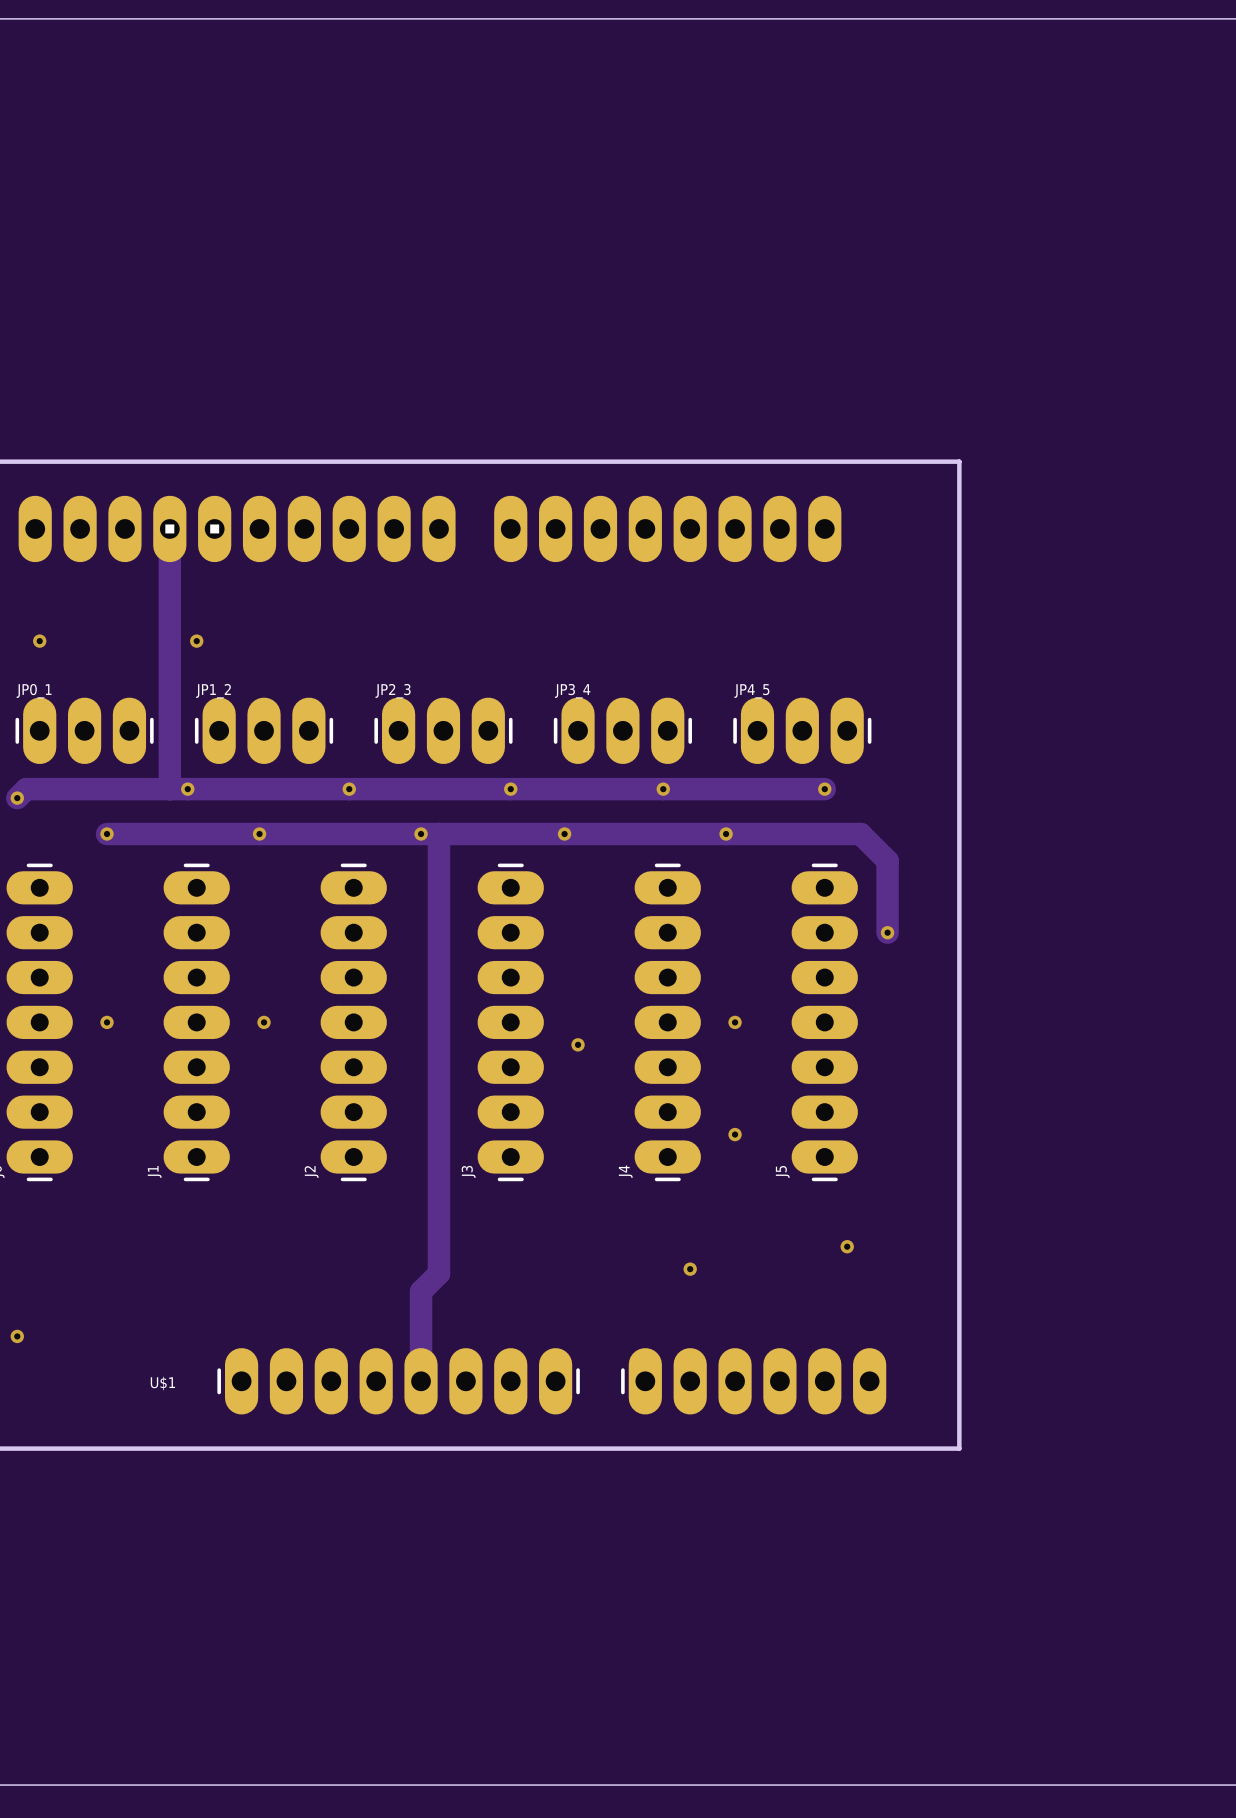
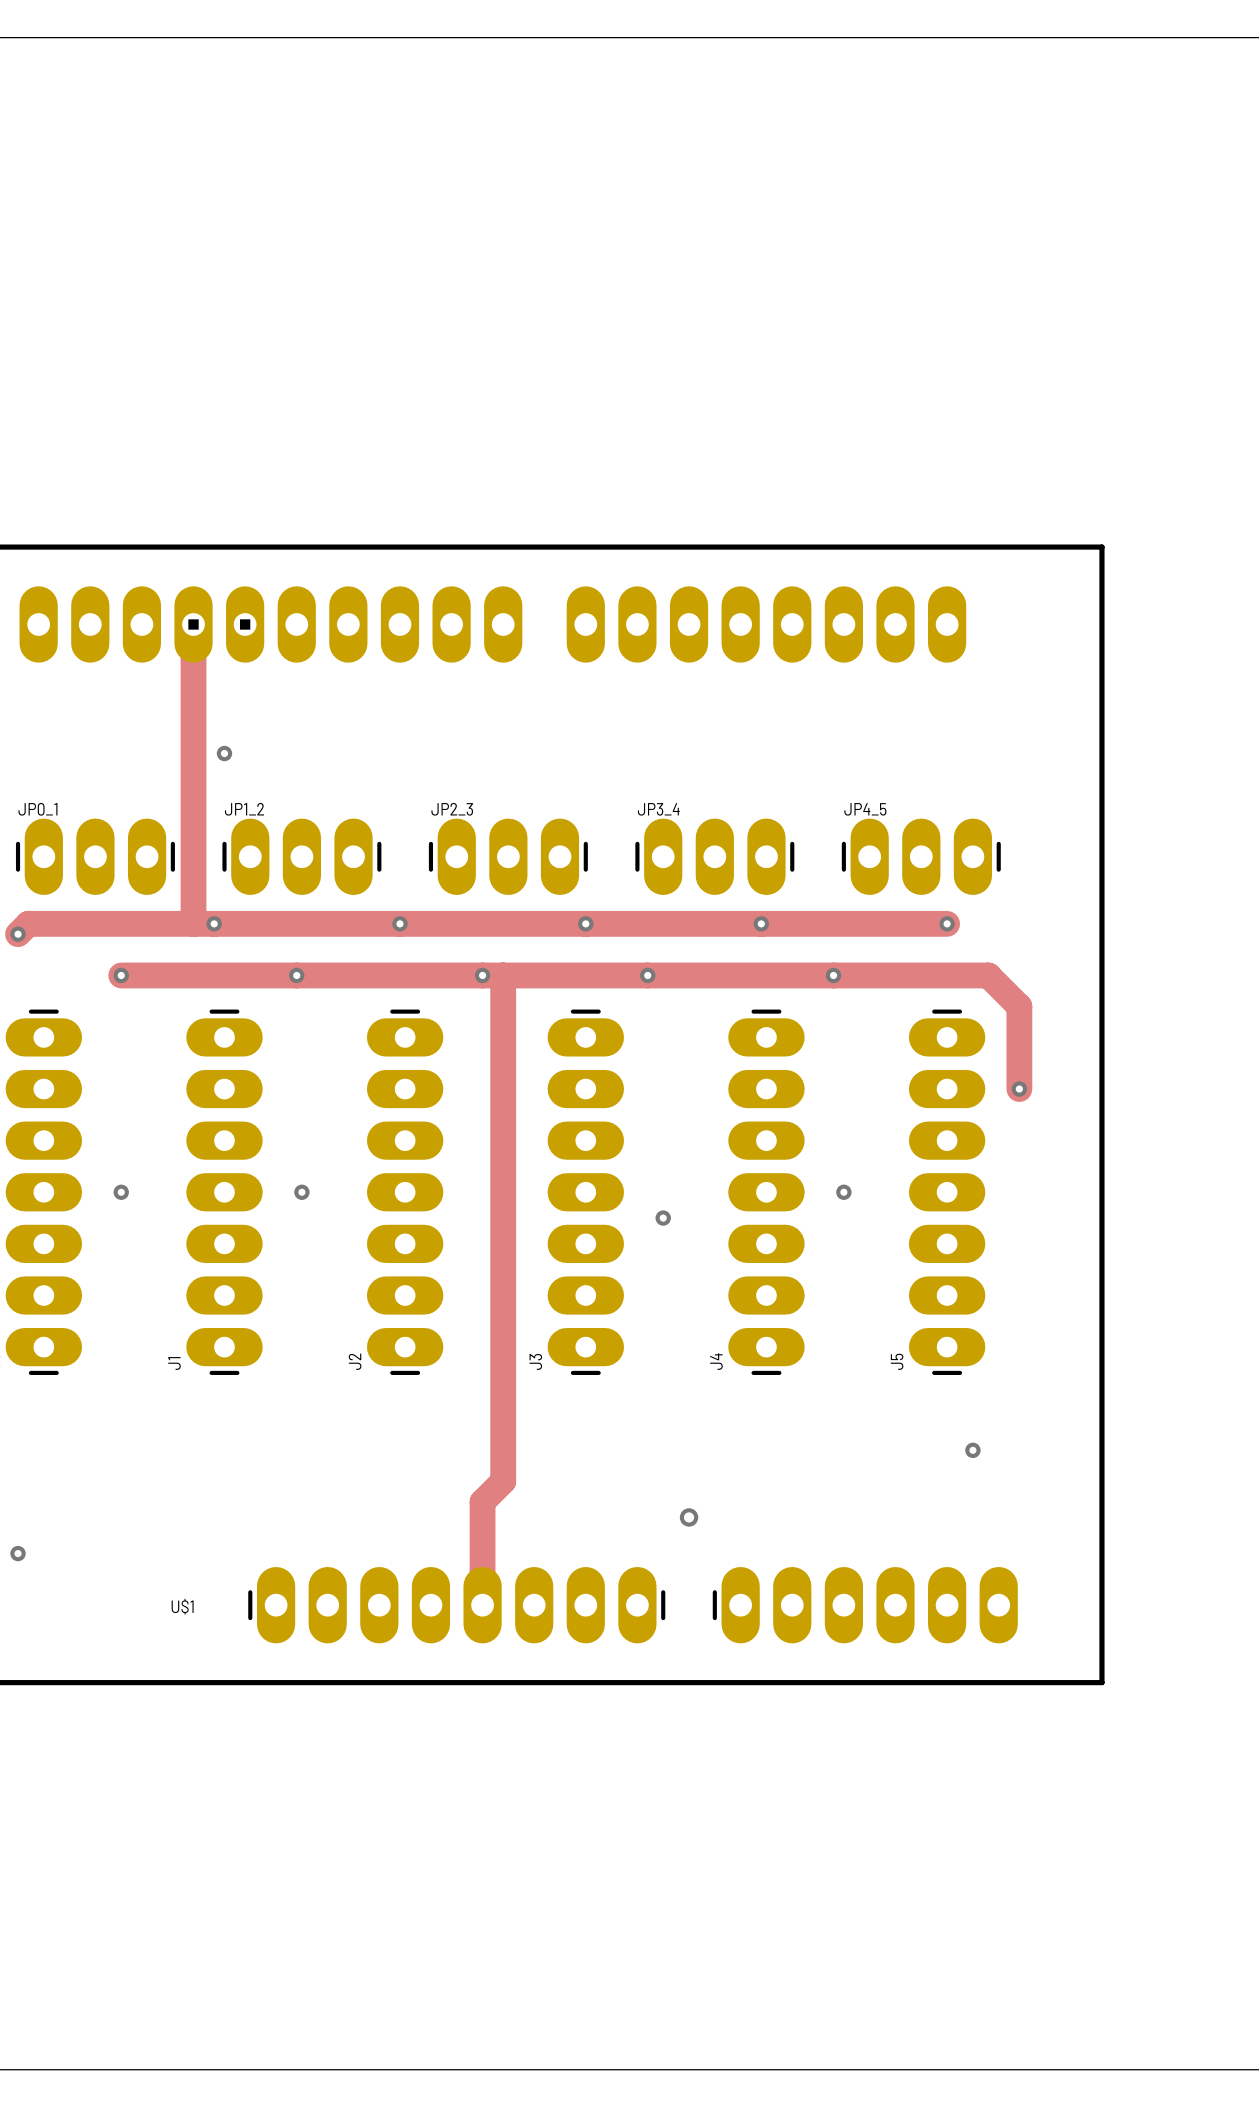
via: (39, 641) -> none
via: (735, 1134) -> none
via: (690, 1269) -> none
via: none -> (689, 1517)

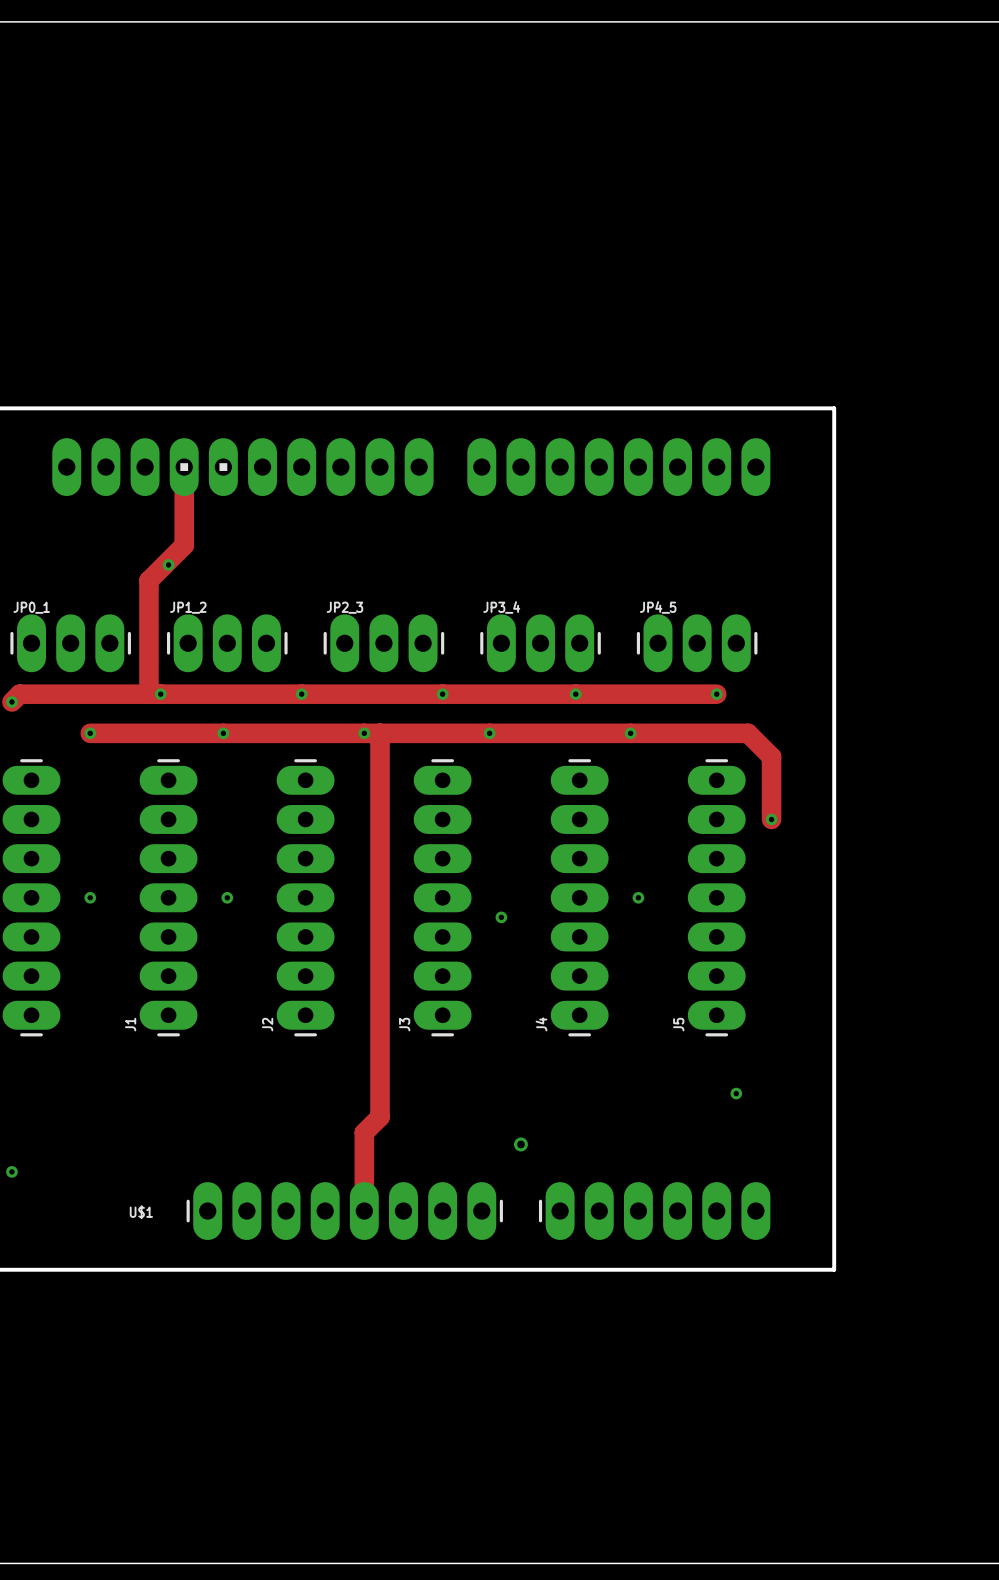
U$1 footprint: [19, 586, 1018, 1644] -> [52, 438, 771, 1241]
track: (193, 624) (193, 923) -> none
track: none -> (184, 467) (184, 545) (148, 580) (148, 694)

